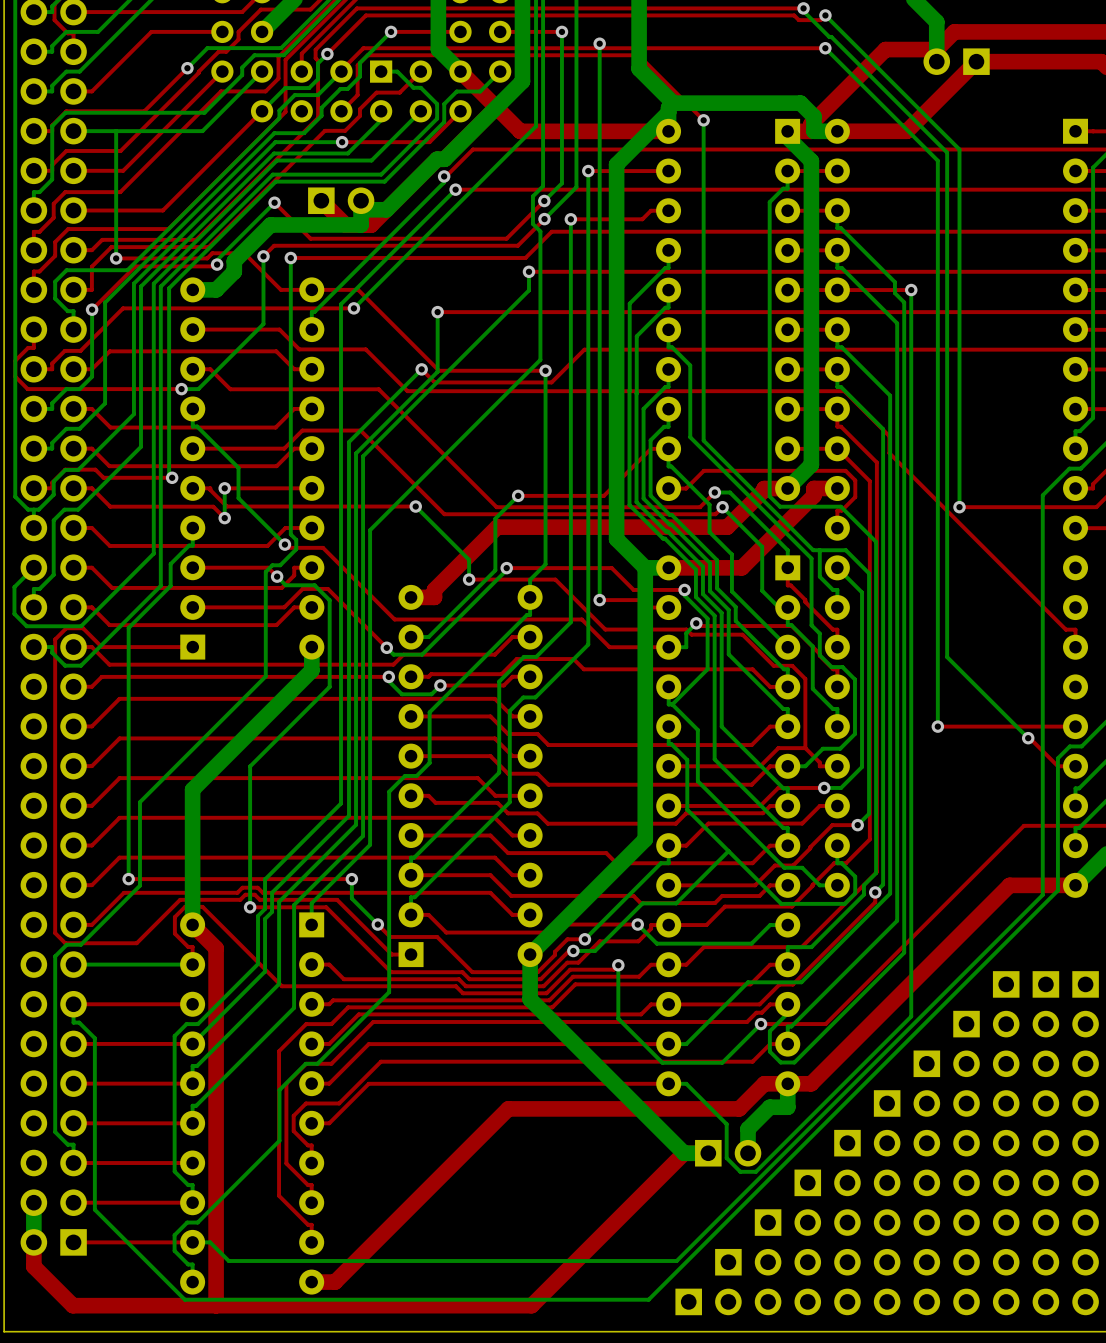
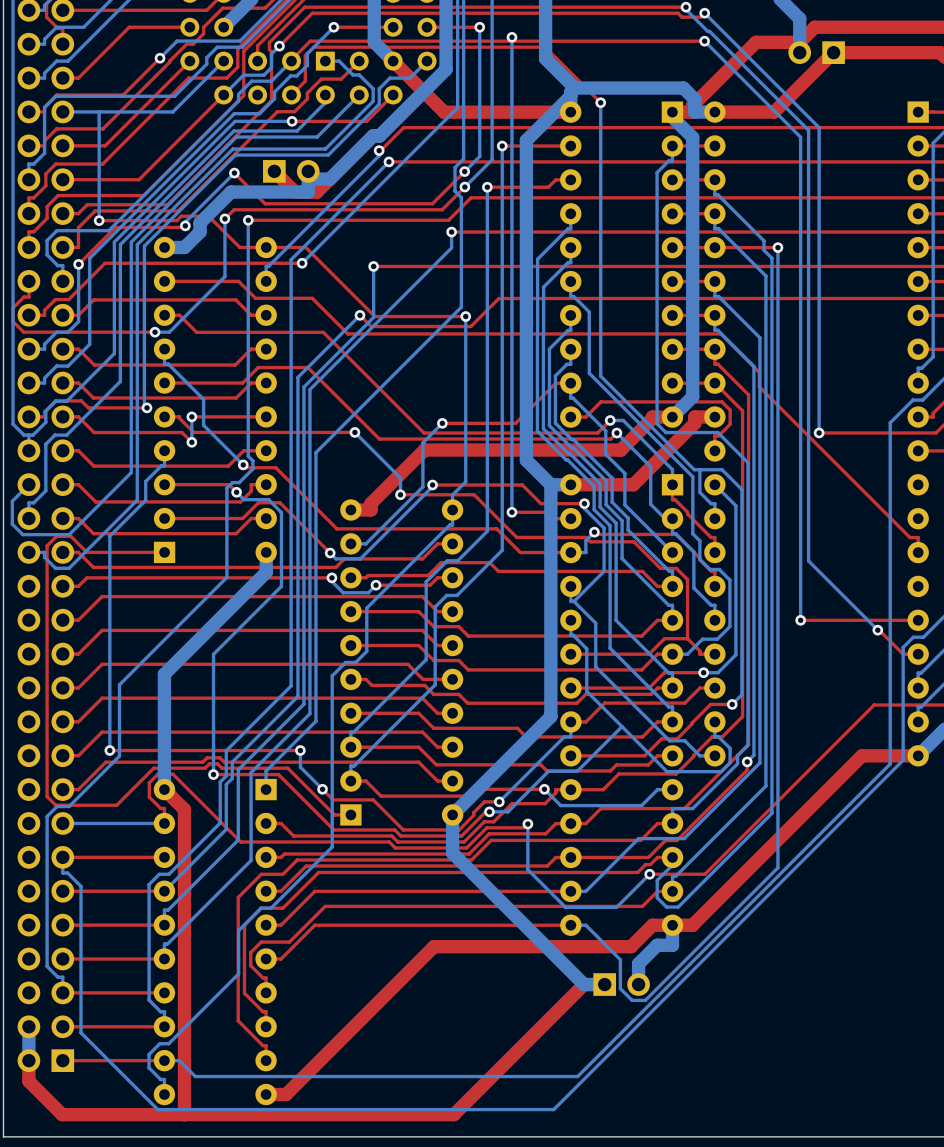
part: (1006, 1143) -> none
part: (1045, 1143) -> none
part: (1085, 1143) -> none
part: (966, 1163) -> none
part: (926, 1182) -> none
part: (887, 1202) -> none
part: (847, 1222) -> none
part: (807, 1242) -> none
part: (768, 1262) -> none
part: (728, 1282) -> none
part: (688, 1301) -> none

